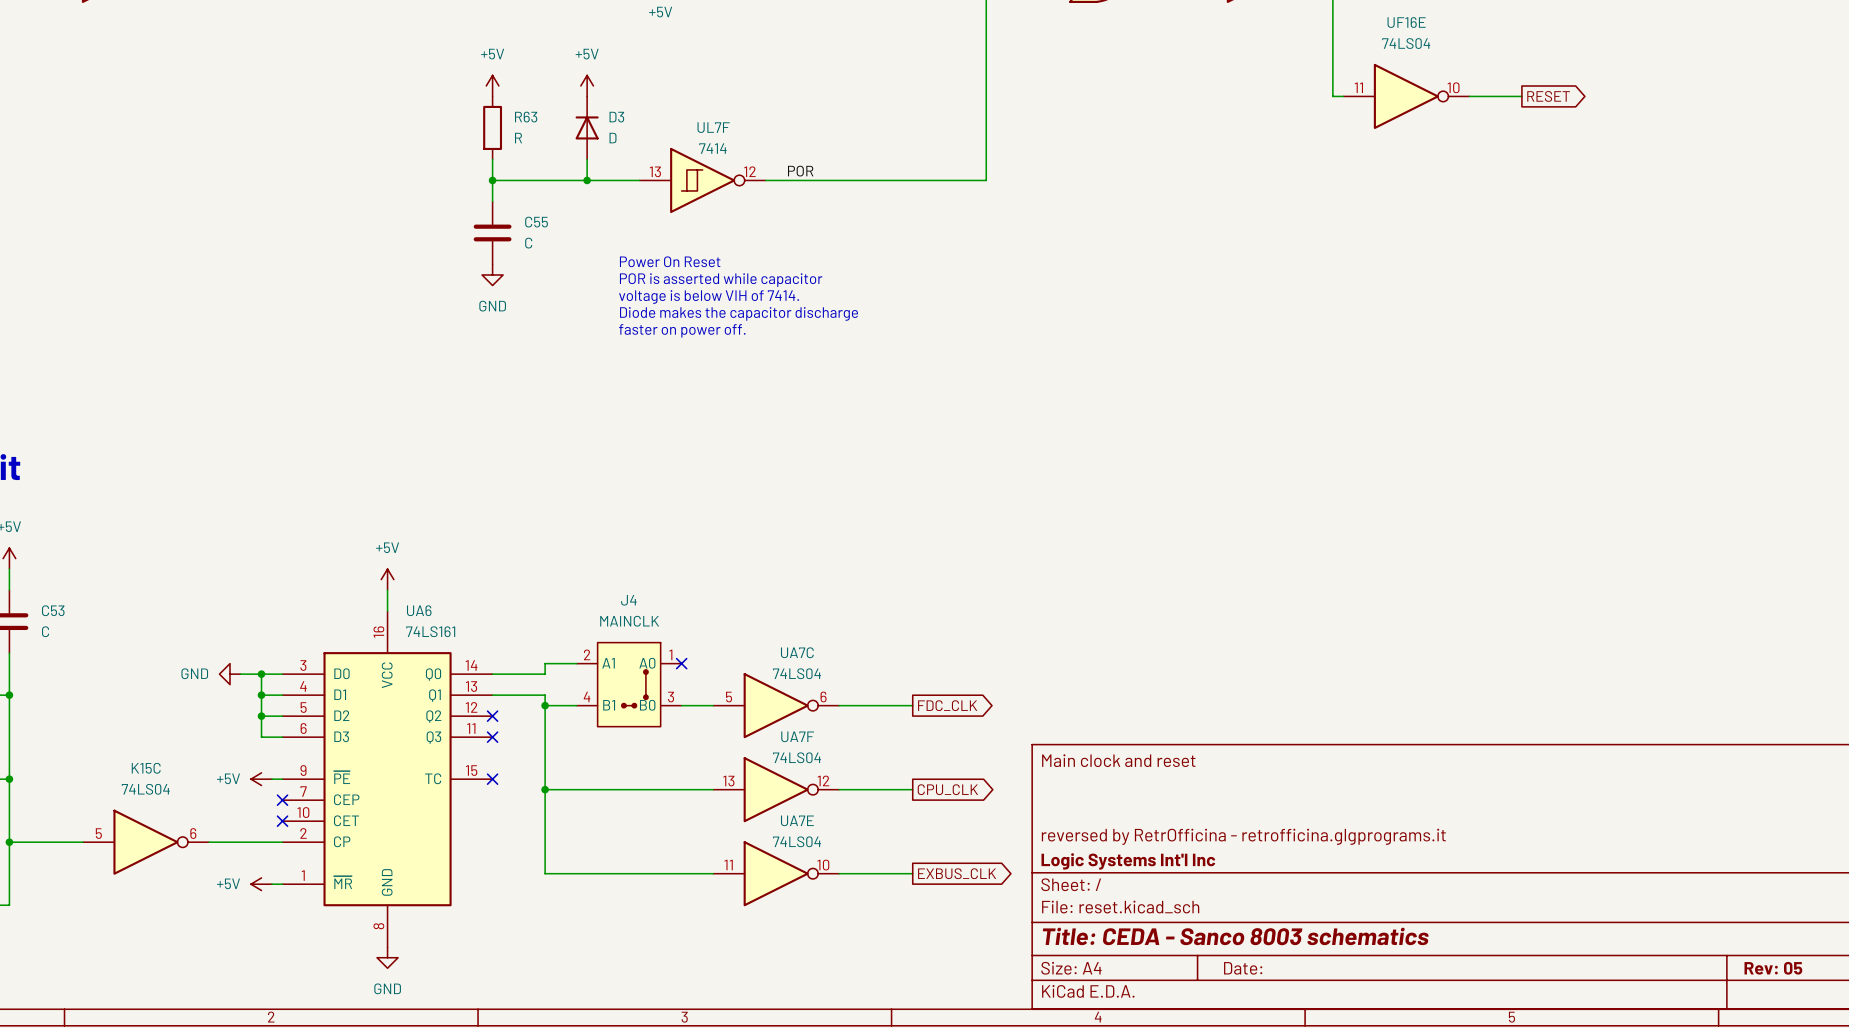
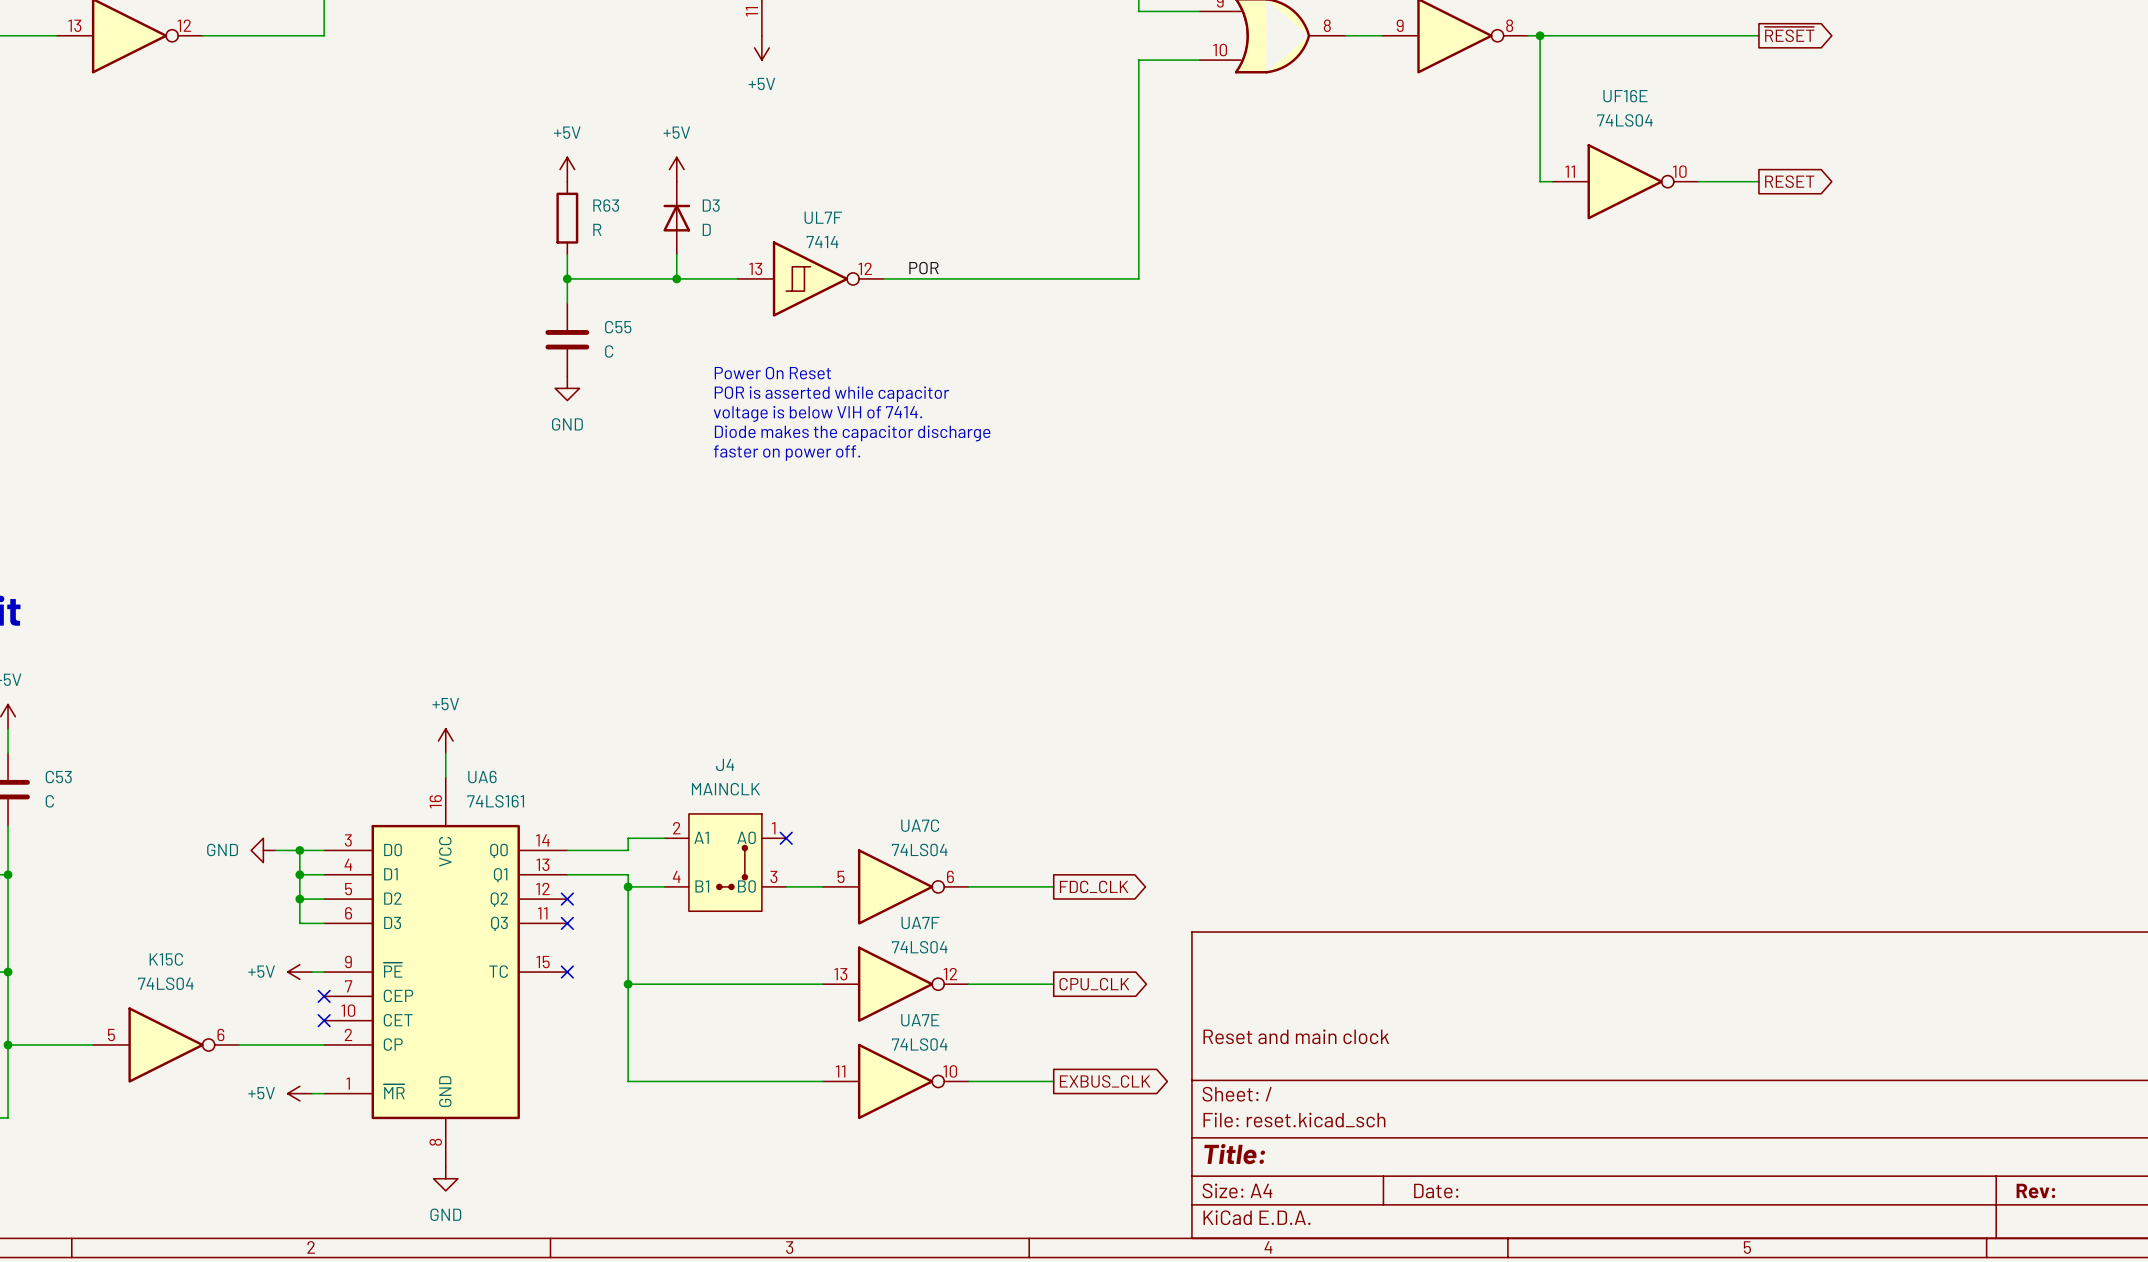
title block: Main clock and reset (1118, 760) -> none
title block: reversed by RetrOfficina - retrofficina.glgprograms.it (1243, 836) -> Reset and main clock (1296, 1036)
title block: Logic Systems Int'l Inc (1128, 861) -> none
title block: Title: CEDA - Sanco 8003 schematics (1235, 936) -> Title: (1234, 1154)
title block: Rev: 05 (1773, 968) -> Rev: (2035, 1191)

